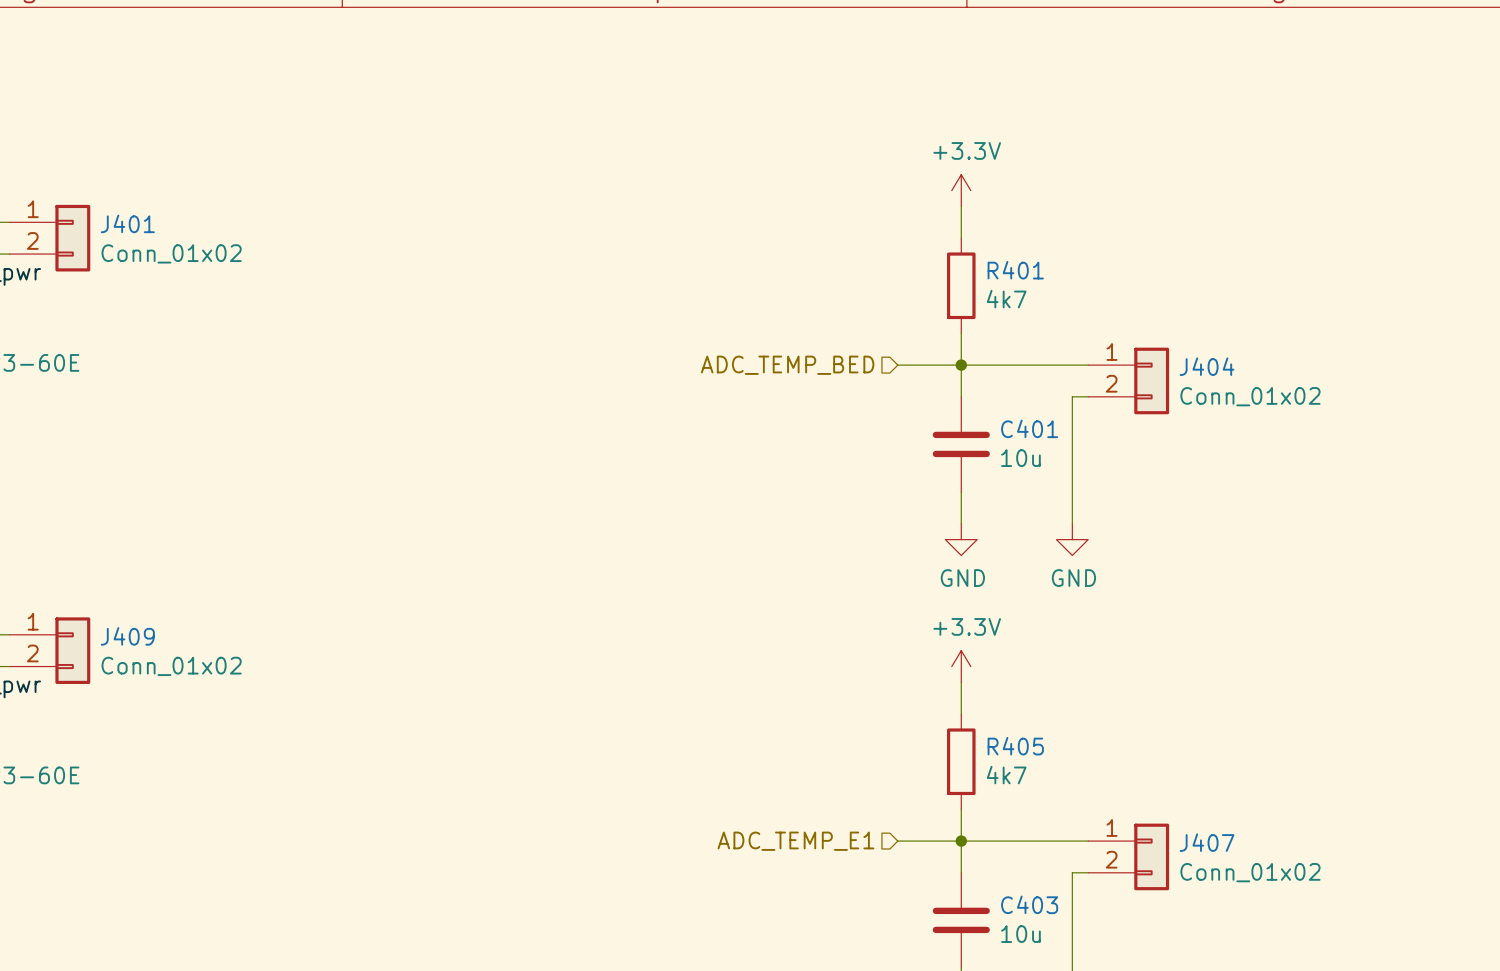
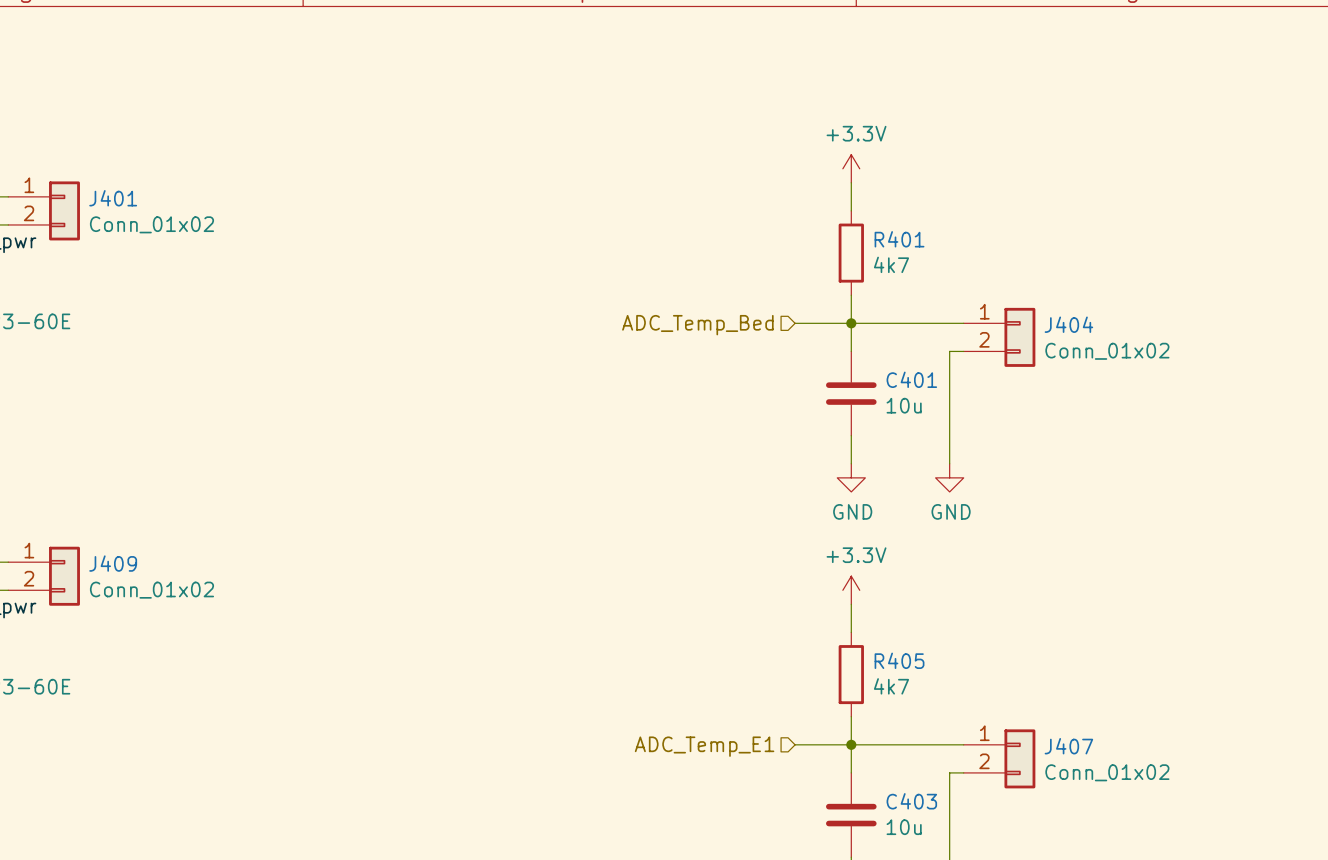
hierarchical label: ADC_TEMP_BED (787, 365) -> ADC_Temp_Bed (697, 325)
hierarchical label: ADC_TEMP_E1 (795, 841) -> ADC_Temp_E1 (704, 746)

